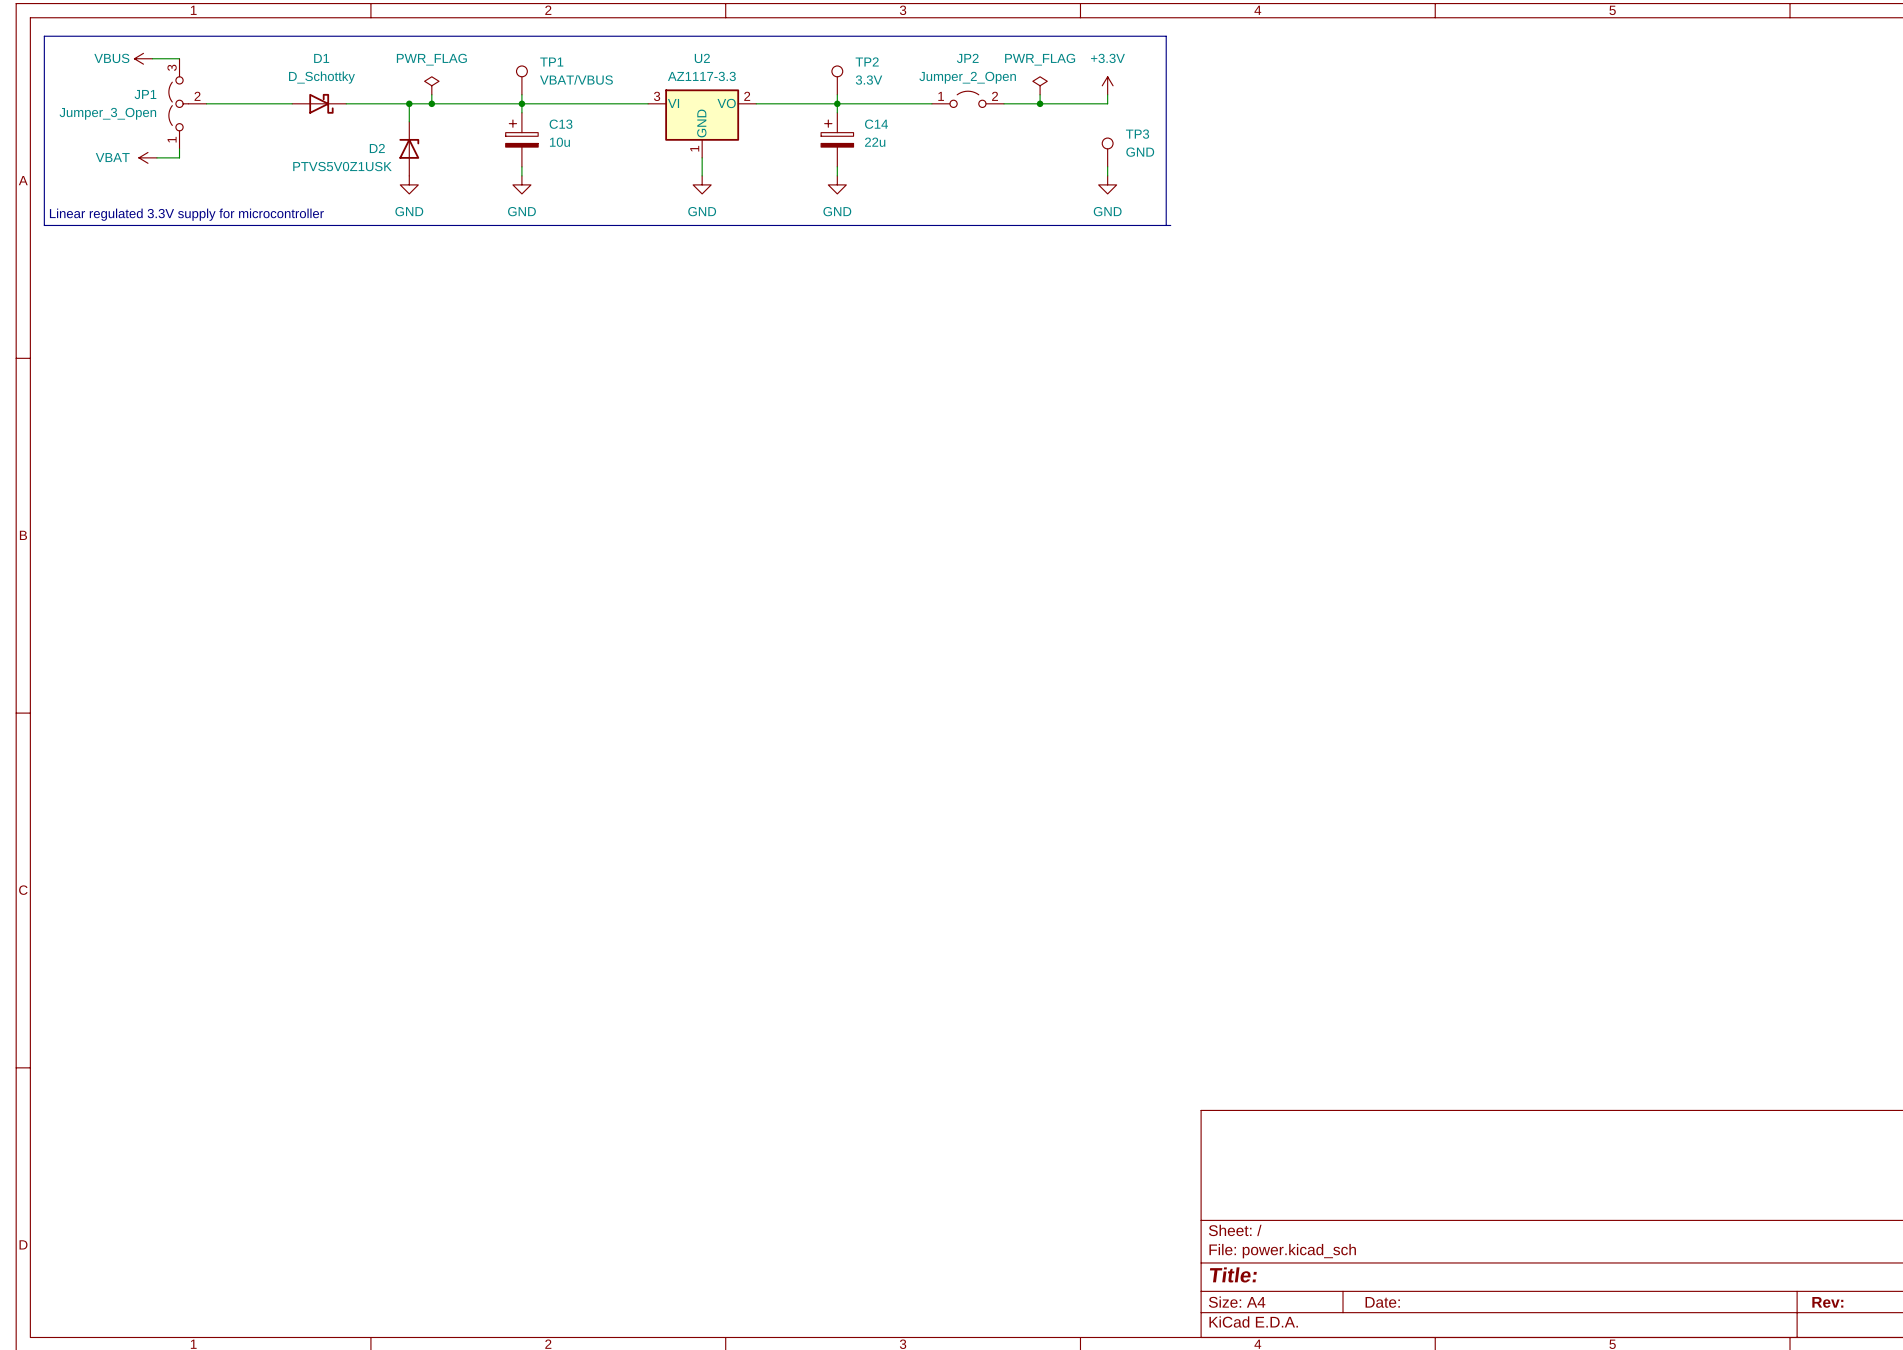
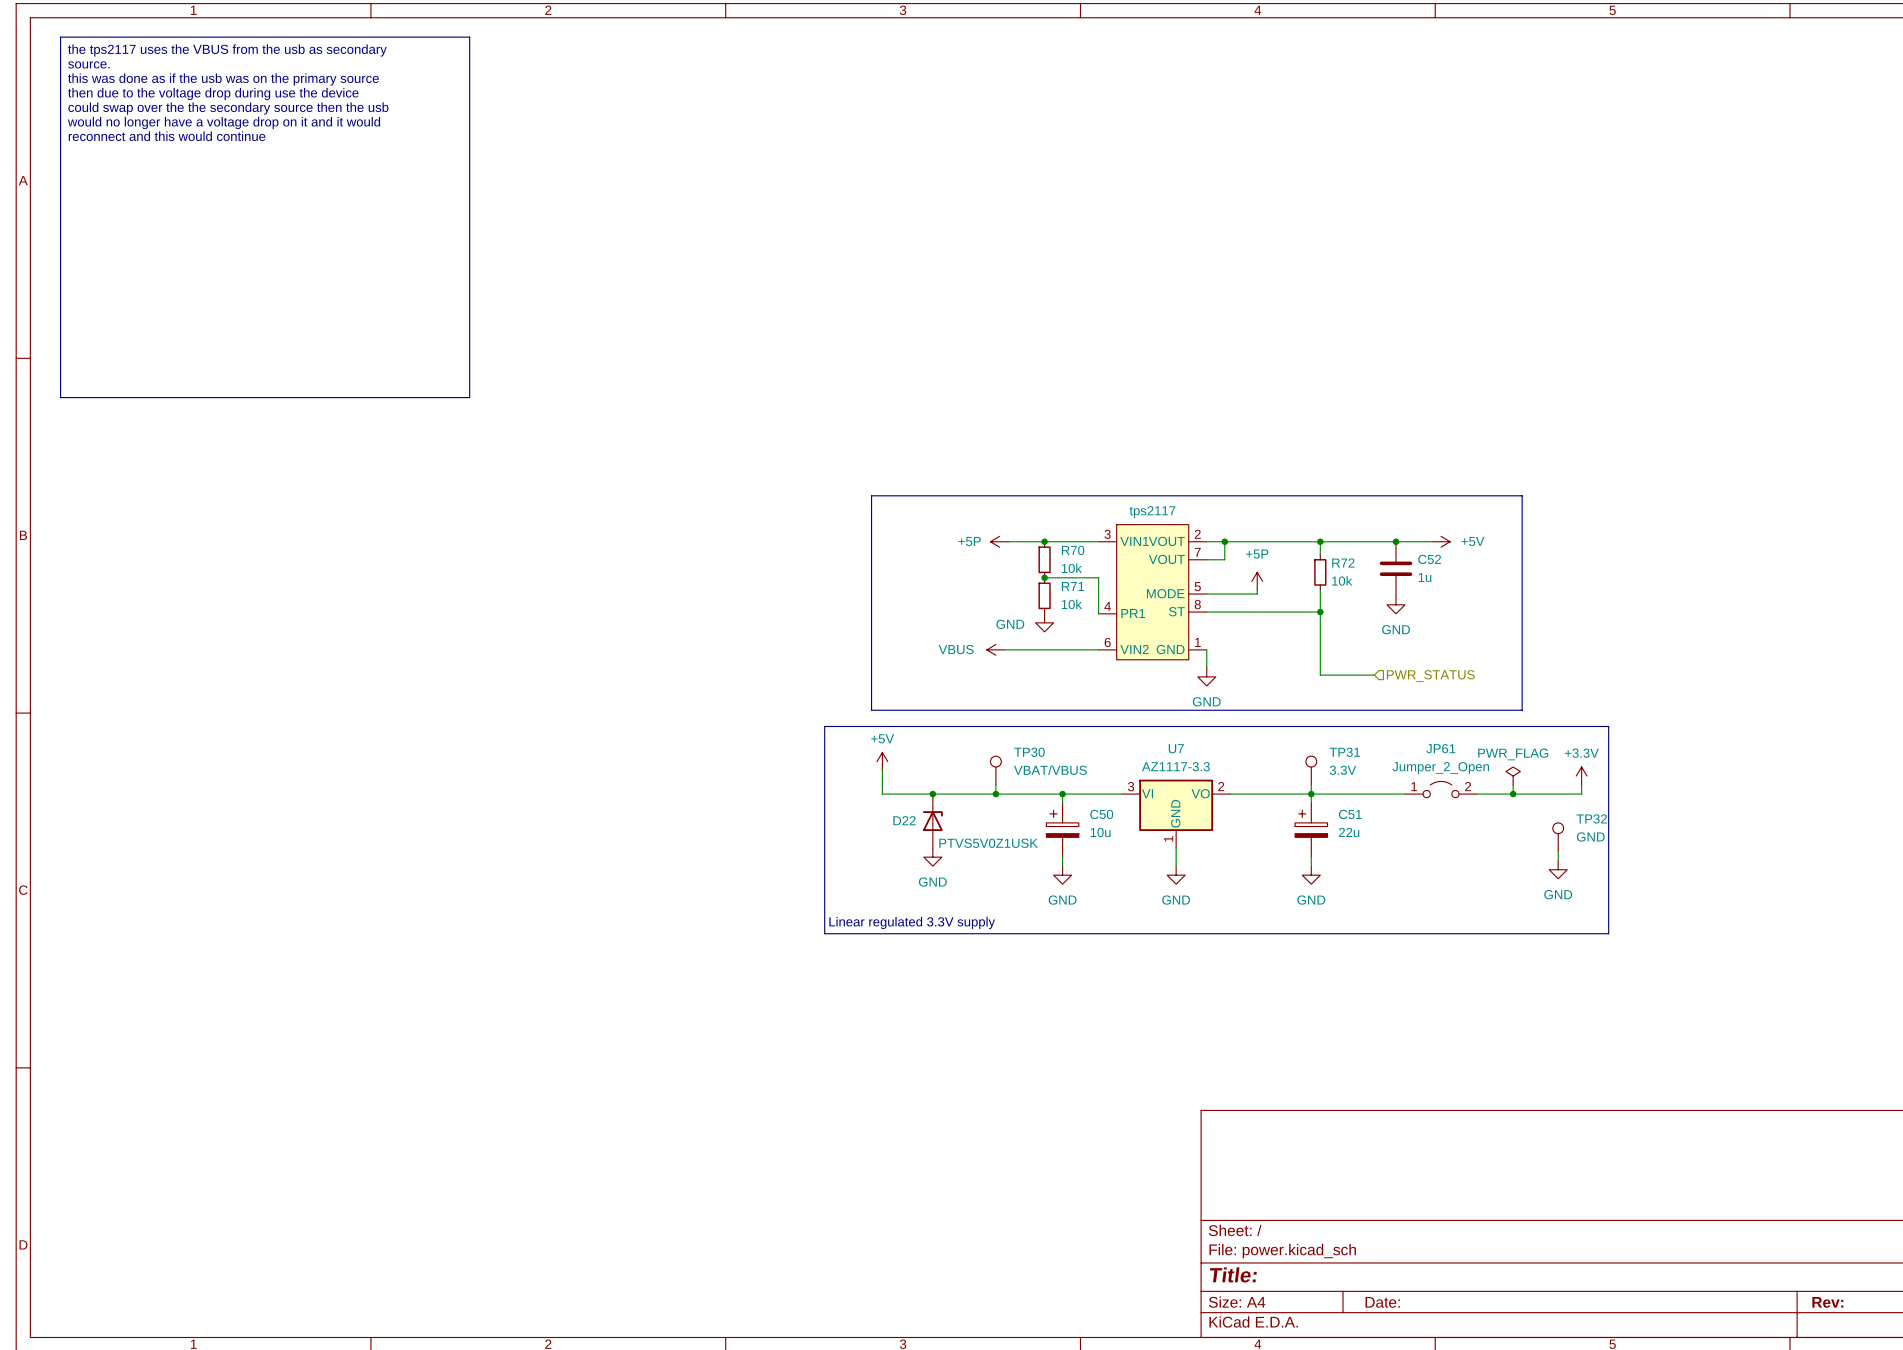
line: none -> (60, 37) (469, 37) (469, 397) (60, 397) (60, 37)
text: none -> the tps2117 uses the VBUS from the usb as secondary (227, 50)
power symbol: VBUS (143, 58) -> none
wire: (152, 58) (179, 58) -> none
text: none -> source. (88, 64)
text: none -> this was done as if the usb was on the primary source (223, 79)
TP1: VBAT/VBUS (521, 80) -> none
TP2: 3.3V (837, 80) -> none
power symbol: PWR_FLAG (431, 85) -> none
power symbol: PWR_FLAG (1040, 85) -> none
power symbol: +3.3V (1107, 85) -> none
text: none -> then due to the voltage drop during use the device (213, 94)
wire: (431, 94) (431, 103) -> none
wire: (521, 94) (521, 112) -> none
wire: (837, 94) (837, 112) -> none
wire: (1040, 94) (1040, 103) -> none
wire: (1107, 94) (1107, 103) (1004, 103) -> none
JP2: Jumper_2_Open (967, 99) -> none
JP1: Jumper_3_Open (187, 103) -> none
wire: (206, 103) (292, 103) -> none
D1: D_Schottky (319, 103) -> none
wire: (346, 103) (648, 103) -> none
wire: (409, 103) (409, 121) -> none
junction: (409, 103) -> none
junction: (431, 103) -> none
junction: (521, 103) -> none
wire: (756, 103) (931, 103) -> none
junction: (837, 103) -> none
junction: (1040, 103) -> none
text: none -> could swap over the the secondary source then the usb (228, 108)
text: none -> would no longer have a voltage drop on it and it would (223, 123)
U2: AZ1117-3.3 (702, 123) -> none
text: none -> reconnect and this would continue (167, 136)
C13: 10u (521, 139) -> none
C14: 22u (837, 139) -> none
wire: (179, 148) (179, 157) (156, 157) -> none
D2: PTVS5V0Z1USK (409, 148) -> none
TP3: GND (1107, 152) -> none
power symbol: VBAT (147, 157) -> none
wire: (702, 157) (702, 175) -> none
wire: (521, 166) (521, 175) -> none
wire: (837, 166) (837, 175) -> none
wire: (1107, 166) (1107, 175) -> none
power symbol: GND (409, 184) -> none
power symbol: GND (521, 184) -> none
power symbol: GND (702, 184) -> none
power symbol: GND (837, 184) -> none
power symbol: GND (1107, 184) -> none
text: Linear regulated 3.3V supply for microcontroller (186, 214) -> none
line: (1166, 225) (1166, 36) (44, 36) (44, 225) (1170, 225) -> none
line: none -> (871, 495) (1522, 495) (1522, 710) (871, 710) (871, 495)
power symbol: none -> +5P (999, 541)
wire: none -> (1008, 541) (1098, 541)
junction: none -> (1044, 541)
wire: none -> (1206, 541) (1432, 541)
wire: none -> (1224, 541) (1224, 559) (1206, 559)
junction: none -> (1224, 541)
wire: none -> (1320, 541) (1320, 554)
junction: none -> (1320, 541)
junction: none -> (1396, 541)
power symbol: none -> +5V (1441, 541)
R70: none -> 10k (1044, 559)
C52: none -> 1u (1396, 568)
R72: none -> 10k (1320, 572)
wire: none -> (1044, 577) (1098, 577) (1098, 613)
junction: none -> (1044, 577)
power symbol: none -> +5P (1257, 581)
wire: none -> (1257, 590) (1257, 594) (1206, 594)
wire: none -> (1320, 590) (1320, 675) (1374, 675)
part: none -> tps2117 (1152, 592)
R71: none -> 10k (1044, 595)
power symbol: none -> GND (1396, 604)
wire: none -> (1206, 612) (1320, 612)
junction: none -> (1320, 612)
power symbol: none -> GND (1044, 622)
power symbol: none -> VBUS (995, 649)
wire: none -> (1004, 649) (1098, 649)
wire: none -> (1206, 649) (1206, 667)
power symbol: none -> GND (1206, 676)
hierarchical label: none -> PWR_STATUS (1430, 676)
line: none -> (824, 726) (1608, 726) (1608, 933) (824, 933) (824, 726)
power symbol: none -> +5V (882, 761)
wire: none -> (882, 770) (882, 794) (1122, 794)
TP30: none -> VBAT/VBUS (995, 770)
TP31: none -> 3.3V (1311, 770)
power symbol: none -> PWR_FLAG (1513, 776)
power symbol: none -> +3.3V (1581, 776)
wire: none -> (995, 785) (995, 794)
wire: none -> (1311, 785) (1311, 803)
wire: none -> (1513, 785) (1513, 794)
wire: none -> (1581, 785) (1581, 794) (1477, 794)
JP61: none -> Jumper_2_Open (1441, 789)
junction: none -> (932, 794)
junction: none -> (995, 794)
wire: none -> (1062, 794) (1062, 803)
junction: none -> (1062, 794)
wire: none -> (1230, 794) (1405, 794)
junction: none -> (1311, 794)
junction: none -> (1513, 794)
U7: none -> AZ1117-3.3 (1176, 813)
D22: none -> PTVS5V0Z1USK (932, 821)
C50: none -> 10u (1062, 830)
C51: none -> 22u (1311, 830)
TP32: none -> GND (1558, 837)
wire: none -> (1176, 848) (1176, 866)
wire: none -> (1558, 851) (1558, 860)
power symbol: none -> GND (932, 857)
wire: none -> (1062, 857) (1062, 866)
wire: none -> (1311, 857) (1311, 866)
power symbol: none -> GND (1558, 869)
power symbol: none -> GND (1062, 875)
power symbol: none -> GND (1176, 875)
power symbol: none -> GND (1311, 875)
text: none -> Linear regulated 3.3V supply (912, 922)

